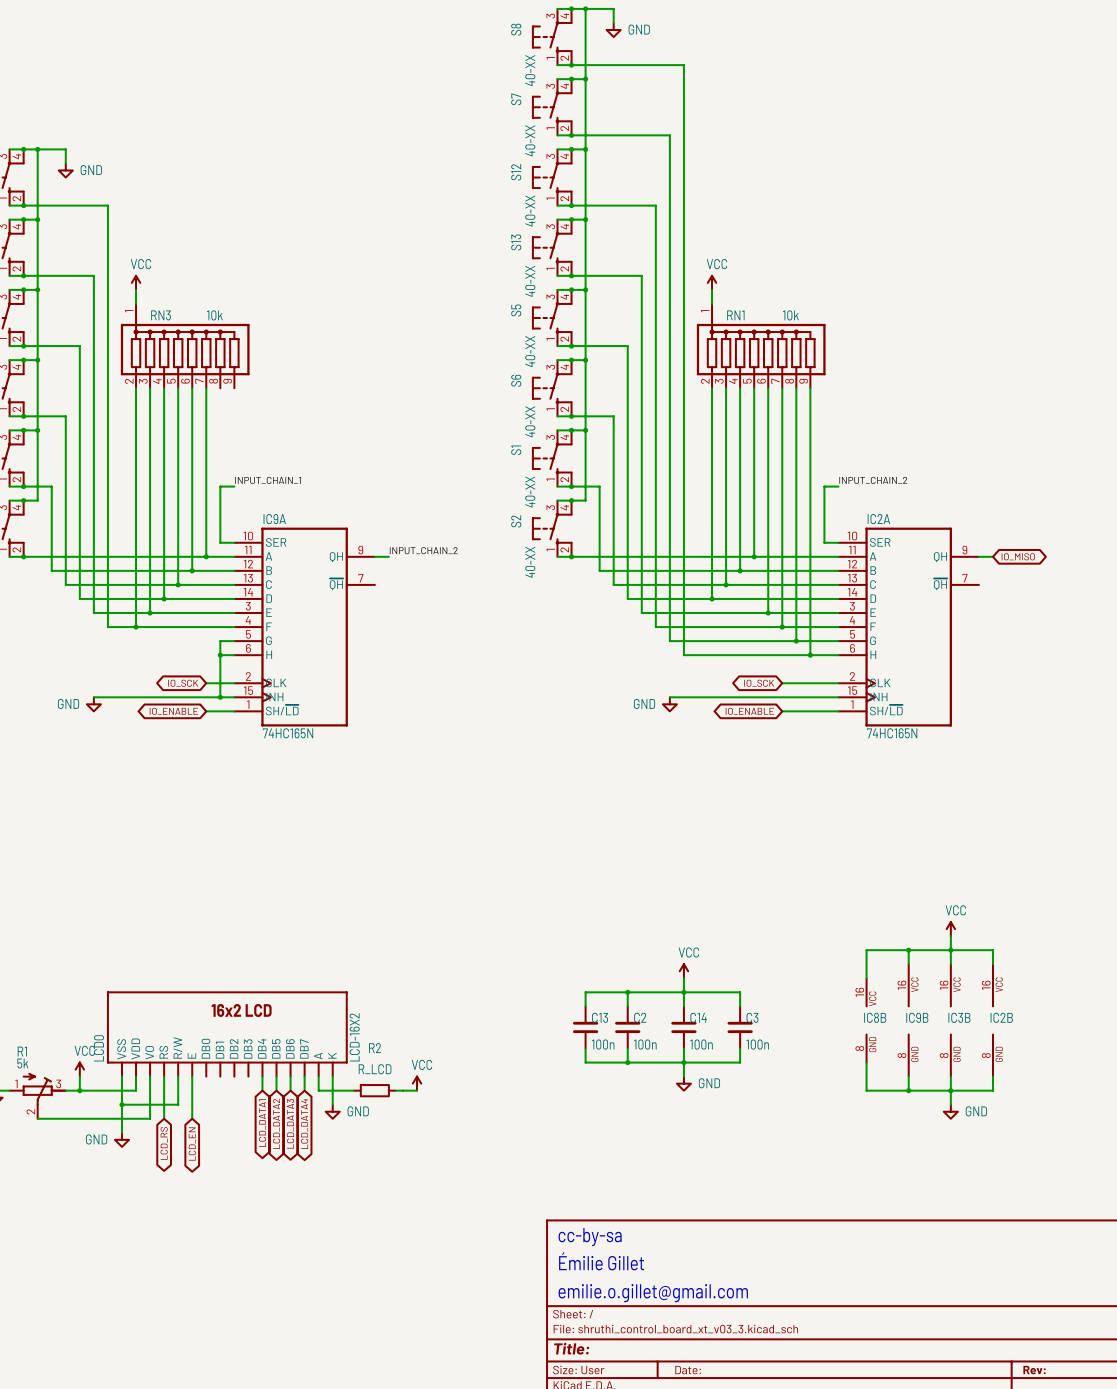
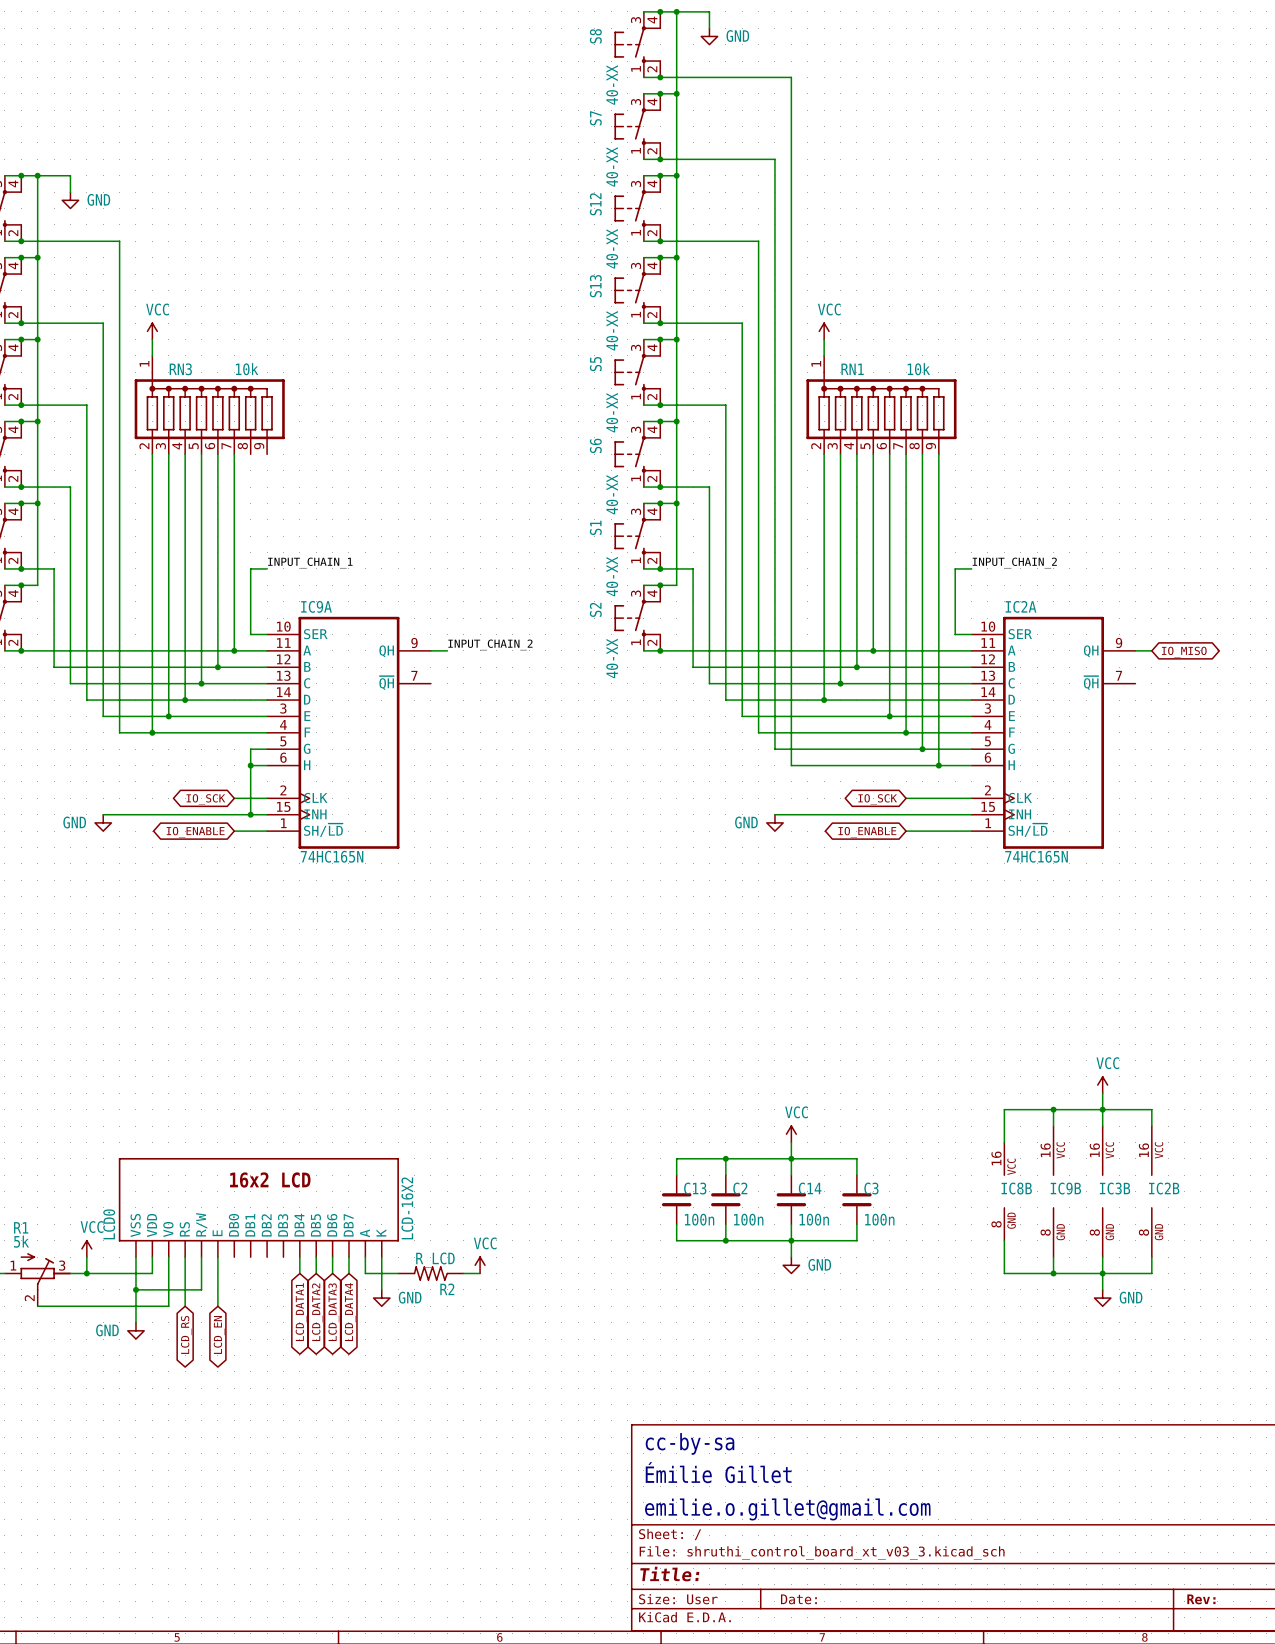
R2 name position: R2 (375, 1048) -> R2 (447, 1289)
R2 symbol: [353, 1084, 396, 1097] -> [398, 1266, 464, 1281]

